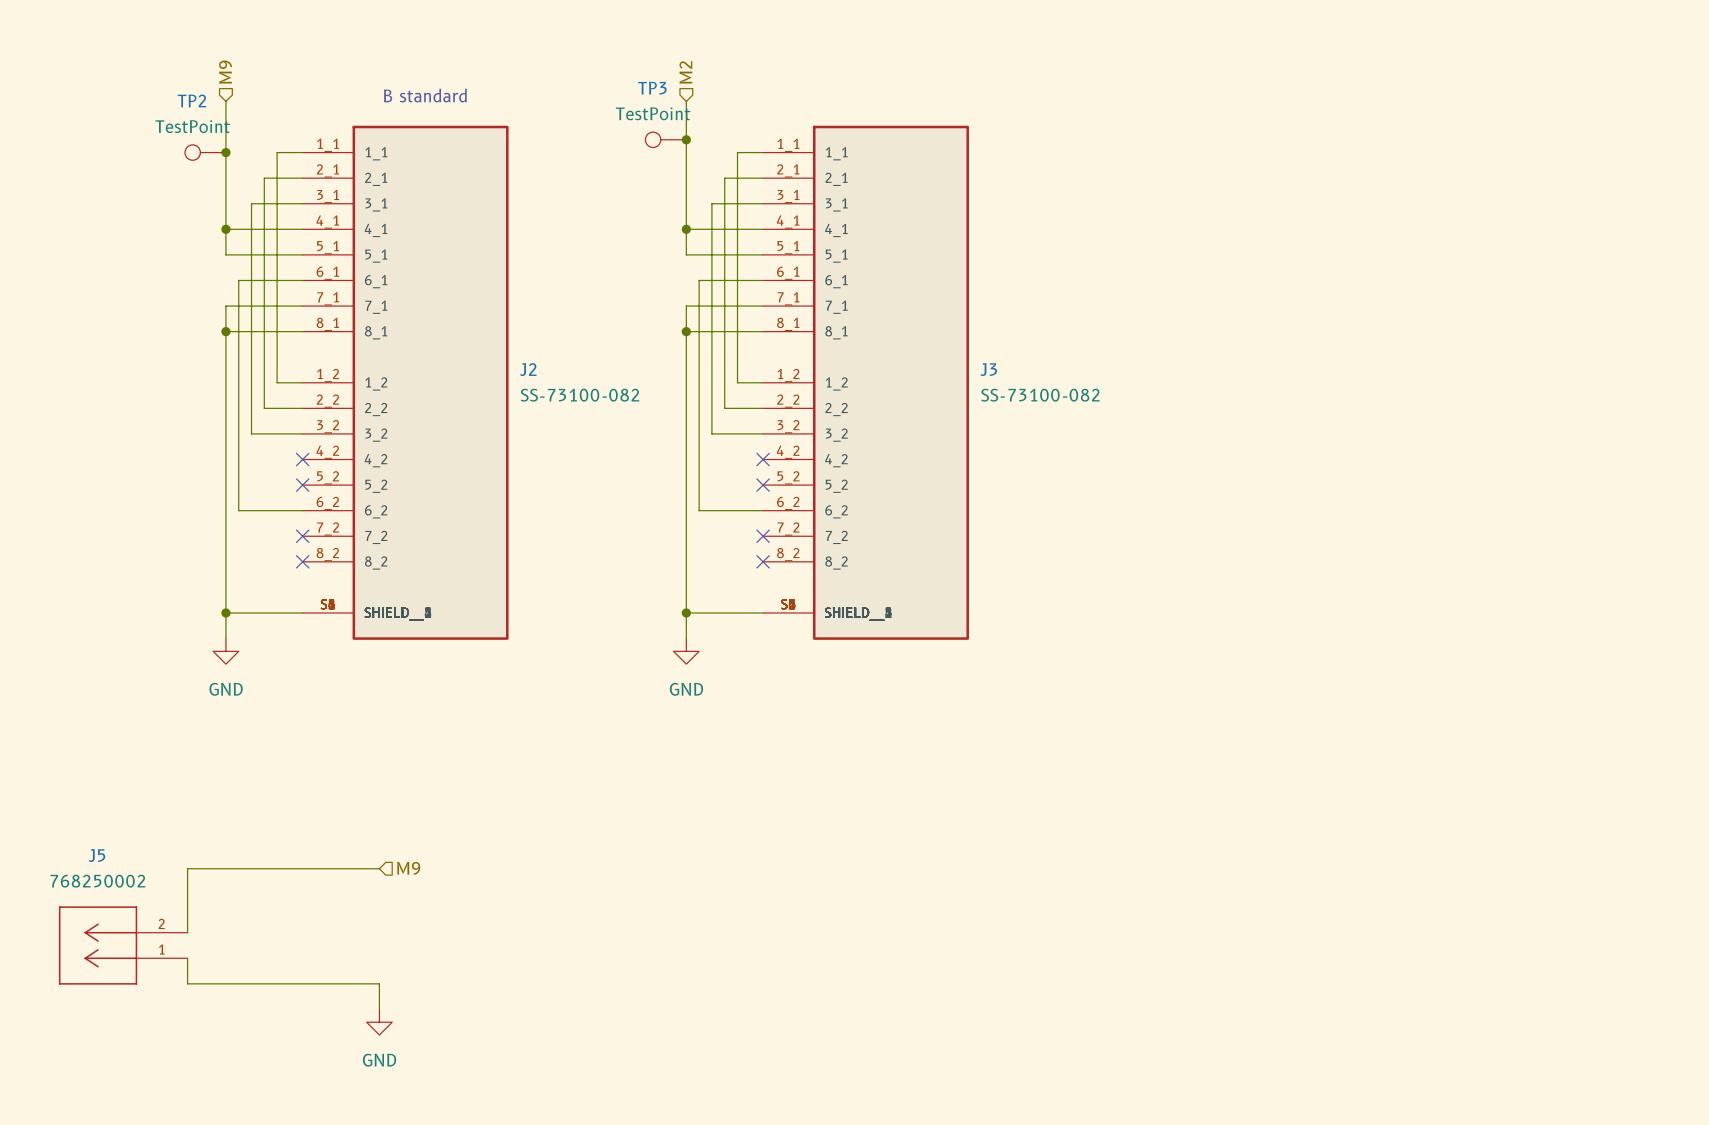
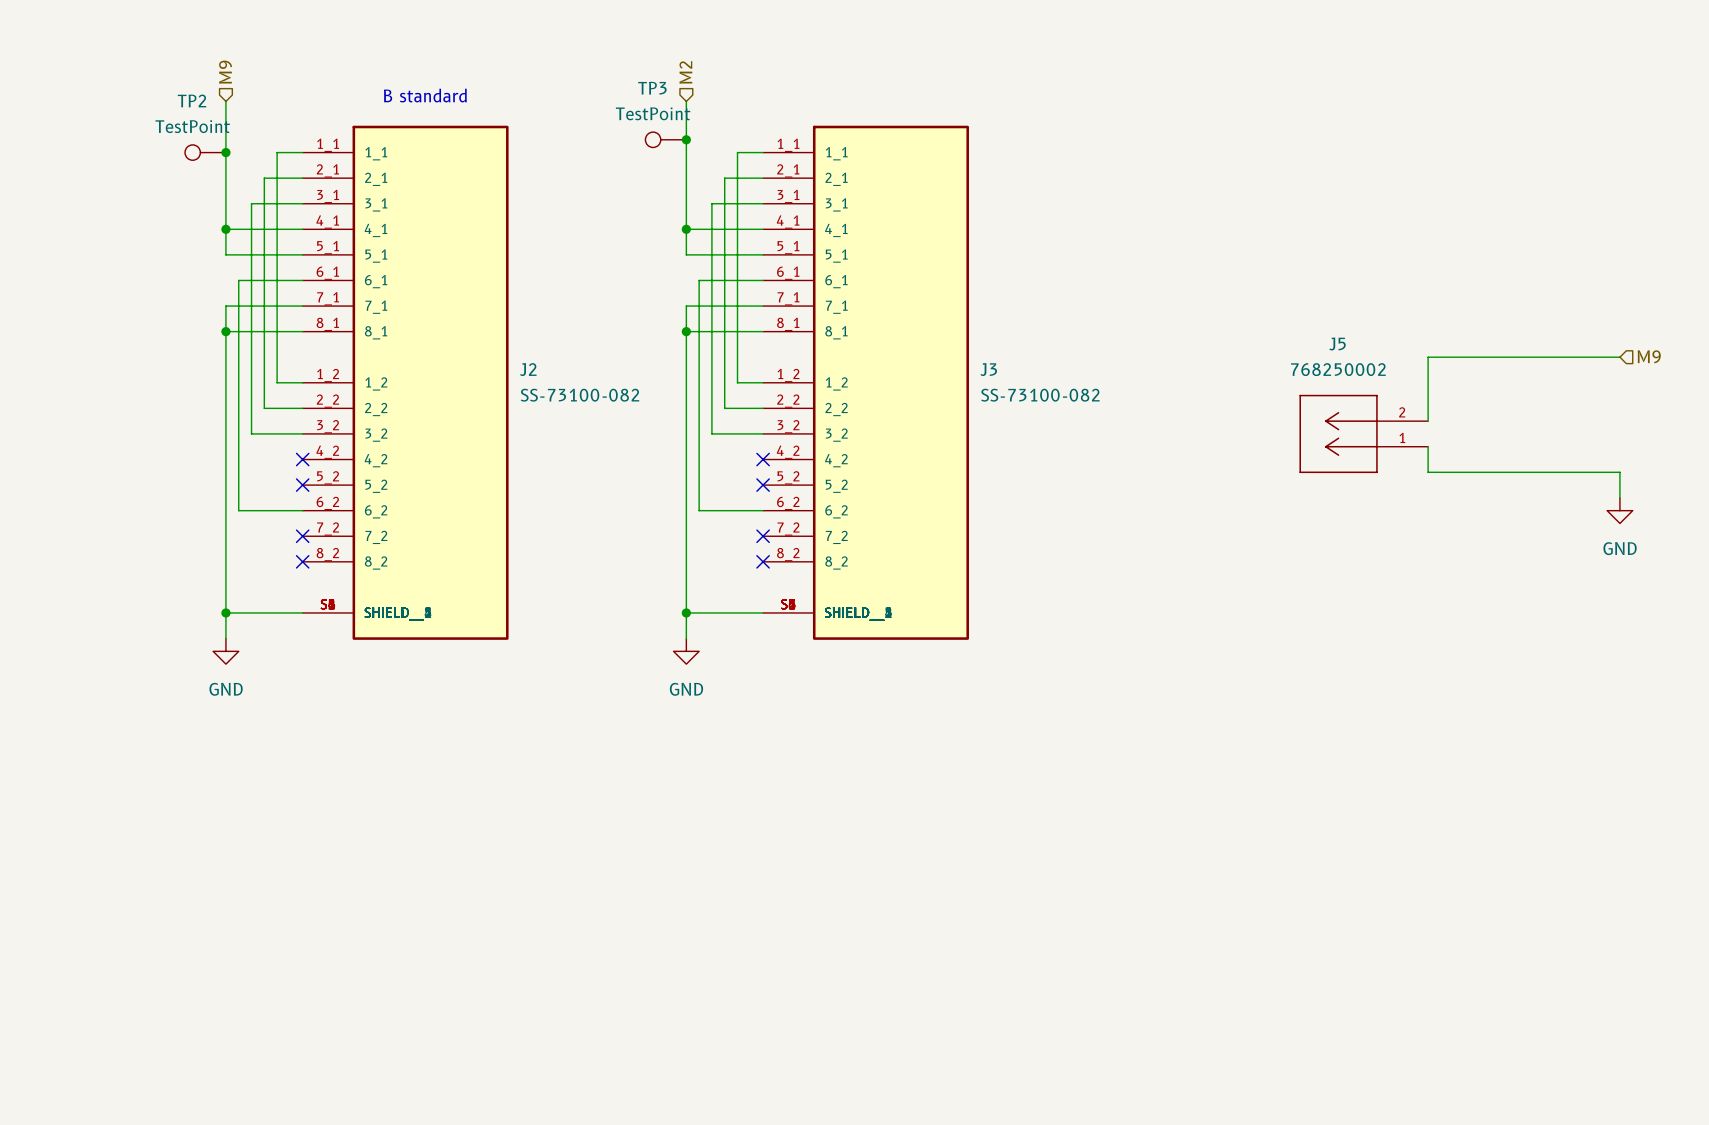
hierarchical label: none -> M9 (1649, 356)
wire: none -> (1619, 357) (1428, 357) (1428, 421)
wire: none -> (1428, 446) (1428, 472) (1619, 472) (1619, 497)
power symbol: none -> GND (1619, 510)
wire: (379, 868) (187, 868) (187, 932) -> none
hierarchical label: M9 (408, 868) -> none
J5 position: (123, 945) -> (1363, 433)
wire: (187, 958) (187, 983) (379, 983) (379, 1009) -> none
power symbol: GND (379, 1022) -> none

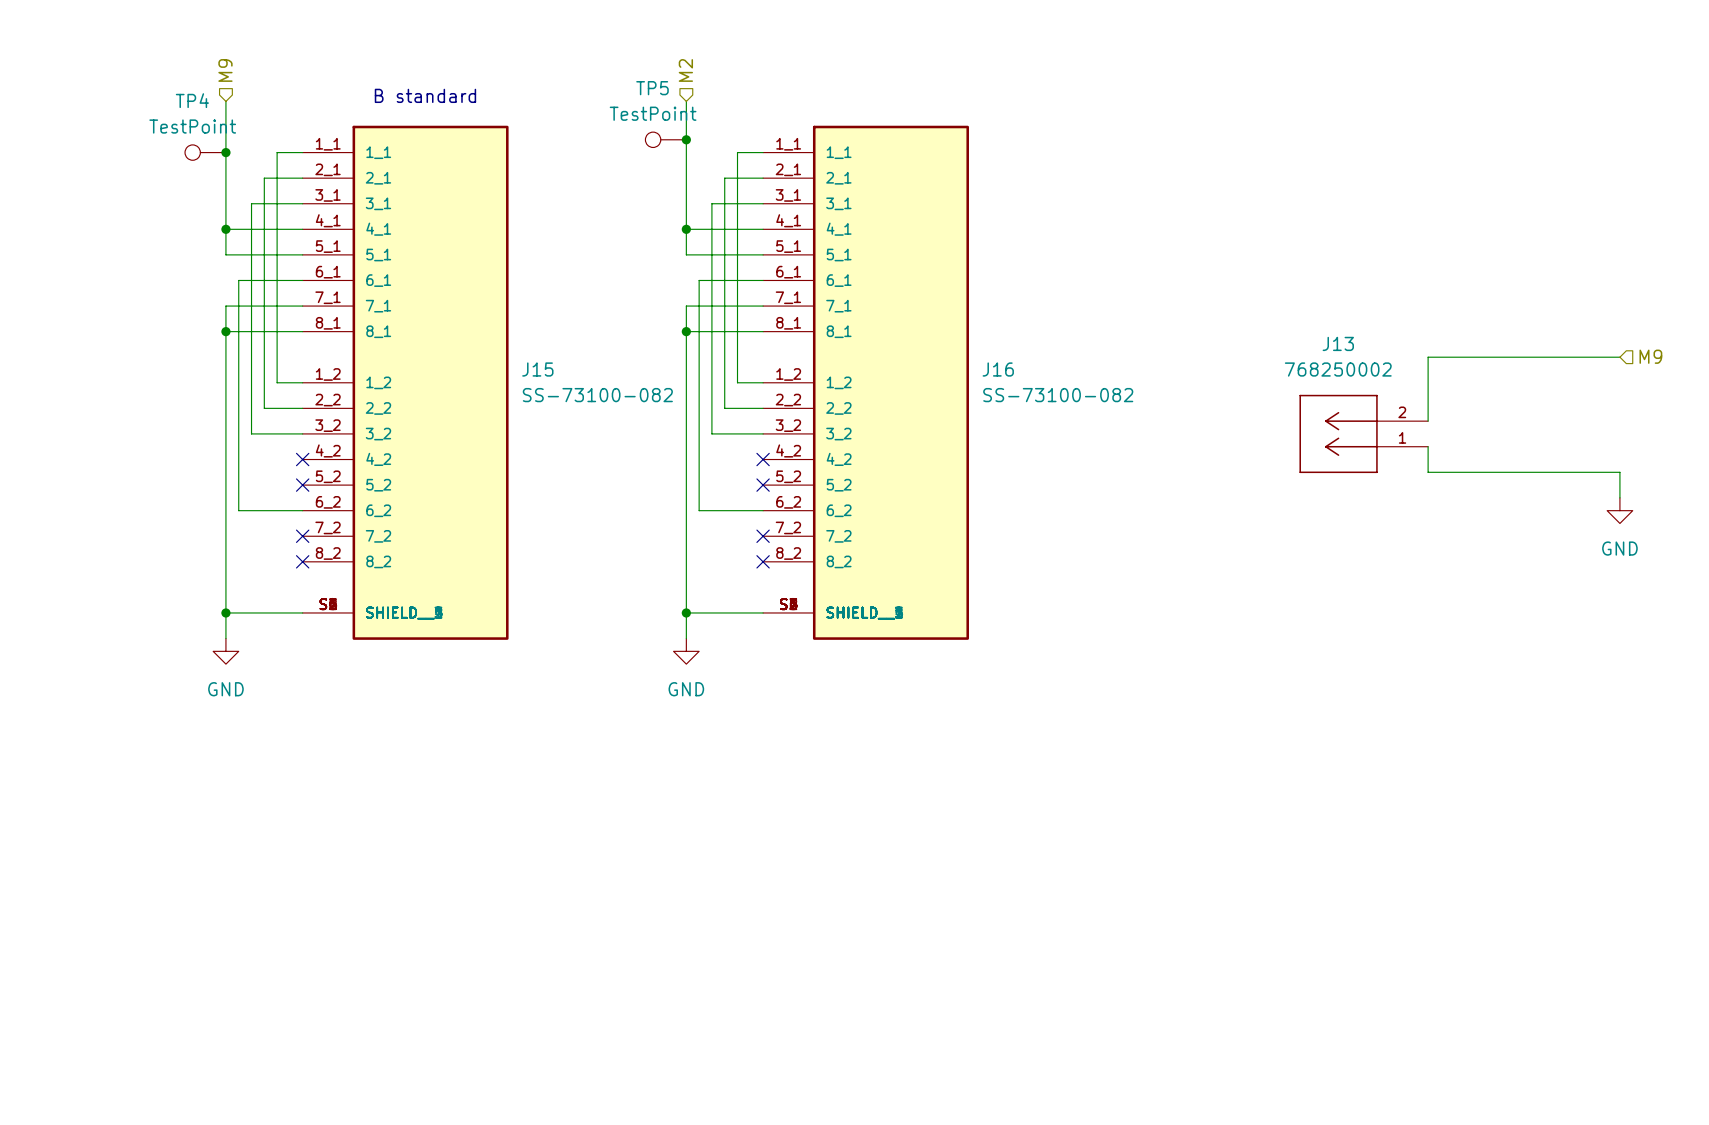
TP3 name: TP3 (652, 88) -> TP5 (652, 88)
TP2 name: TP2 (192, 100) -> TP4 (192, 100)
J5 name: J5 (1337, 344) -> J13 (1338, 343)
J2 name: J2 (528, 369) -> J15 (537, 369)
J3 name: J3 (988, 369) -> J16 (998, 369)

